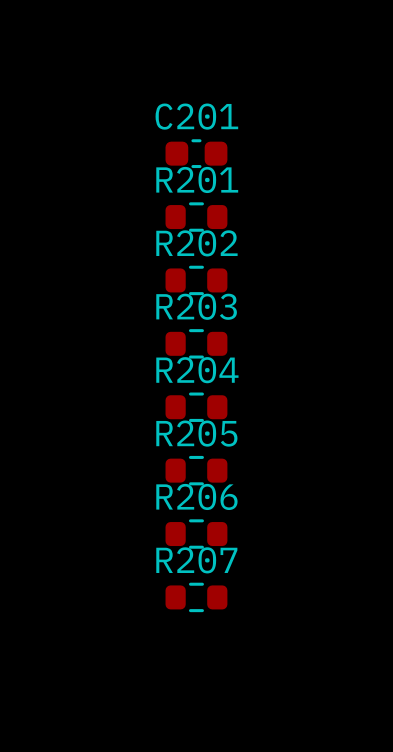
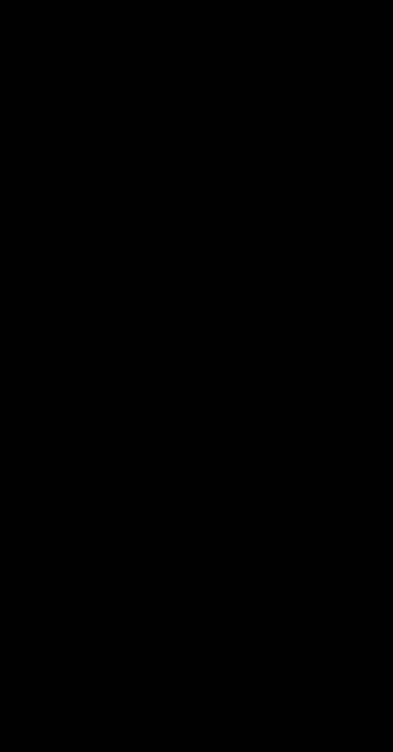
C201: (196, 153) -> none
R201: (196, 217) -> none
R202: (196, 280) -> none
R203: (196, 343) -> none
R204: (196, 407) -> none
R205: (196, 470) -> none
R206: (196, 534) -> none
R207: (196, 597) -> none

